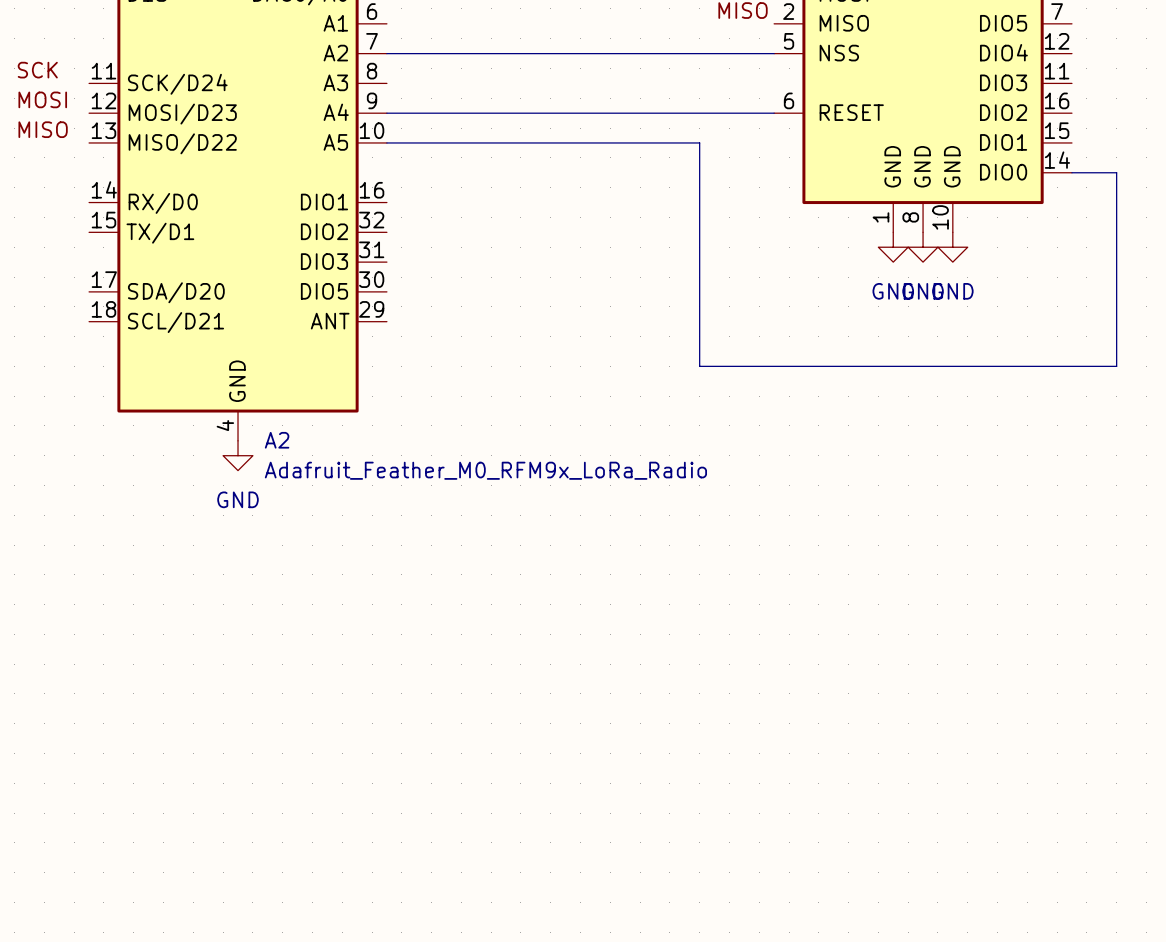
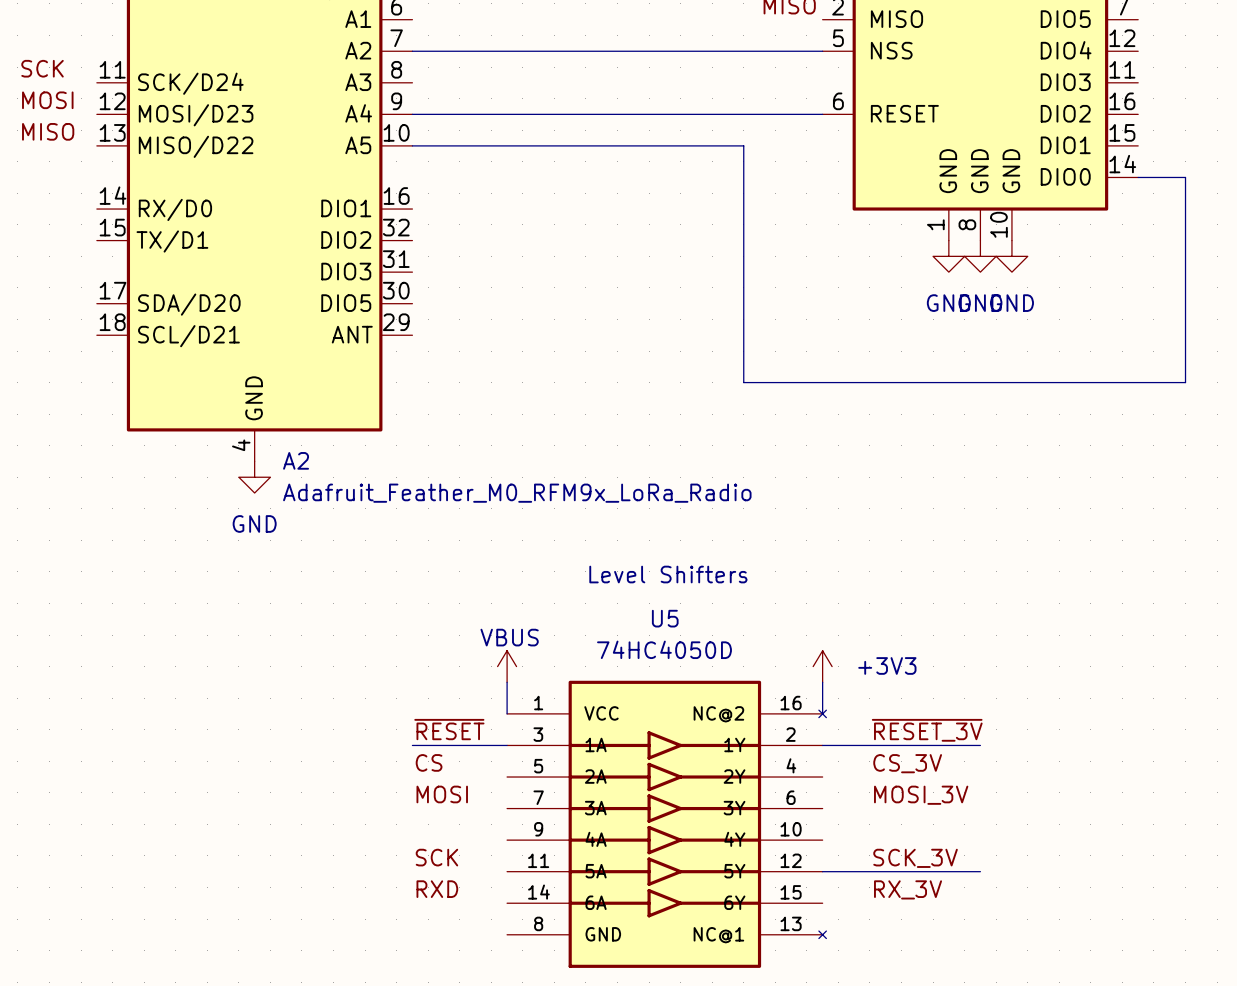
text: none -> Level Shifters (668, 574)
power symbol: none -> VBUS (507, 666)
power symbol: none -> +3V3 (822, 666)
wire: none -> (507, 682) (507, 713)
wire: none -> (822, 682) (822, 713)
label: none -> ~{RESET} (449, 729)
label: none -> ~{RESET_3V} (927, 730)
wire: none -> (412, 745) (507, 745)
wire: none -> (822, 745) (980, 745)
label: none -> CS (429, 762)
label: none -> CS_3V (907, 763)
label: none -> MOSI (442, 794)
label: none -> MOSI_3V (921, 795)
U5: none -> 74HC4050D (666, 824)
label: none -> SCK (436, 857)
label: none -> SCK_3V (915, 858)
wire: none -> (822, 871) (980, 871)
label: none -> RXD (437, 889)
label: none -> RX_3V (908, 889)

